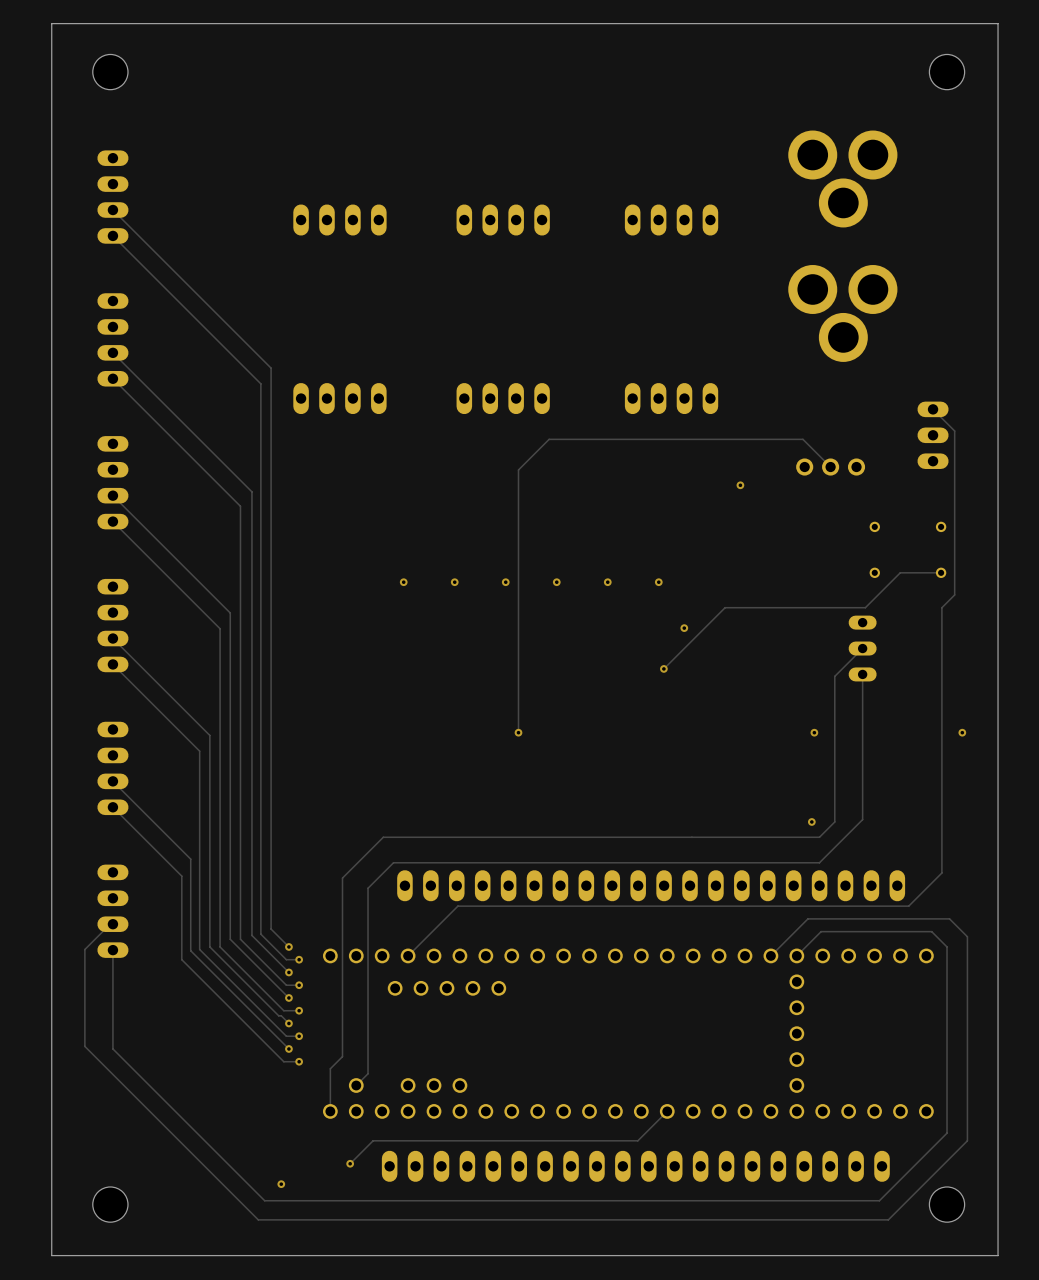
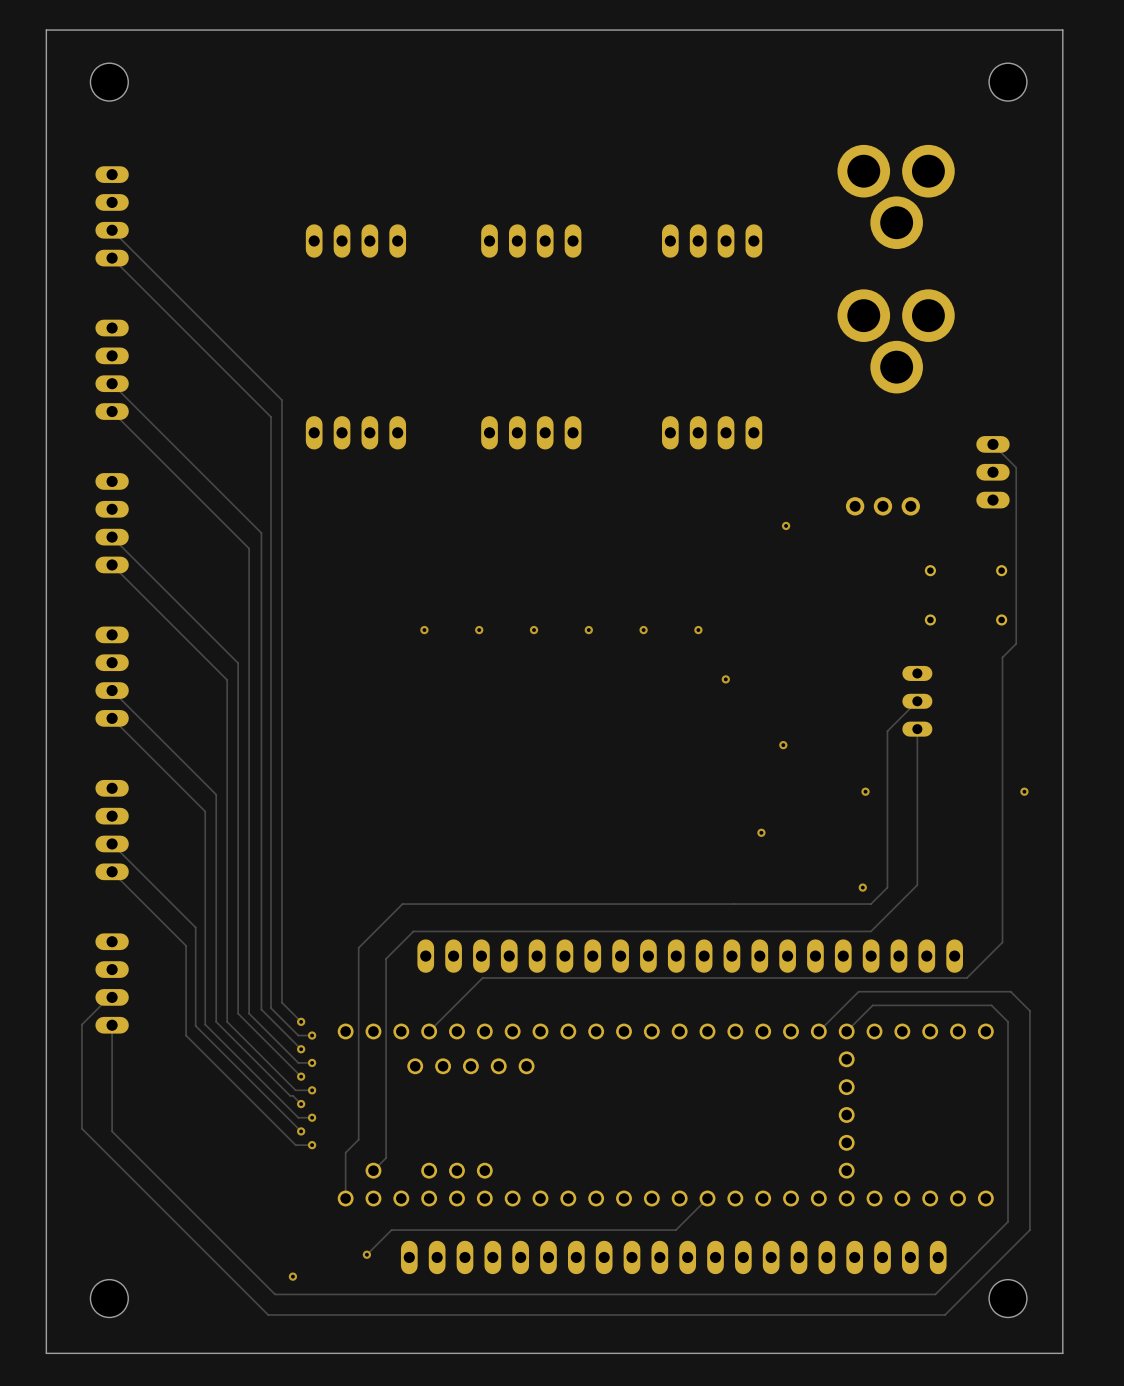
track: (830, 467) (802, 439) (549, 439) (518, 469) (518, 732) -> none
track: (941, 572) (900, 572) (865, 607) (725, 607) (663, 668) -> none
via: (663, 668) -> none
via: none -> (783, 745)
via: (518, 732) -> none
via: none -> (761, 832)

